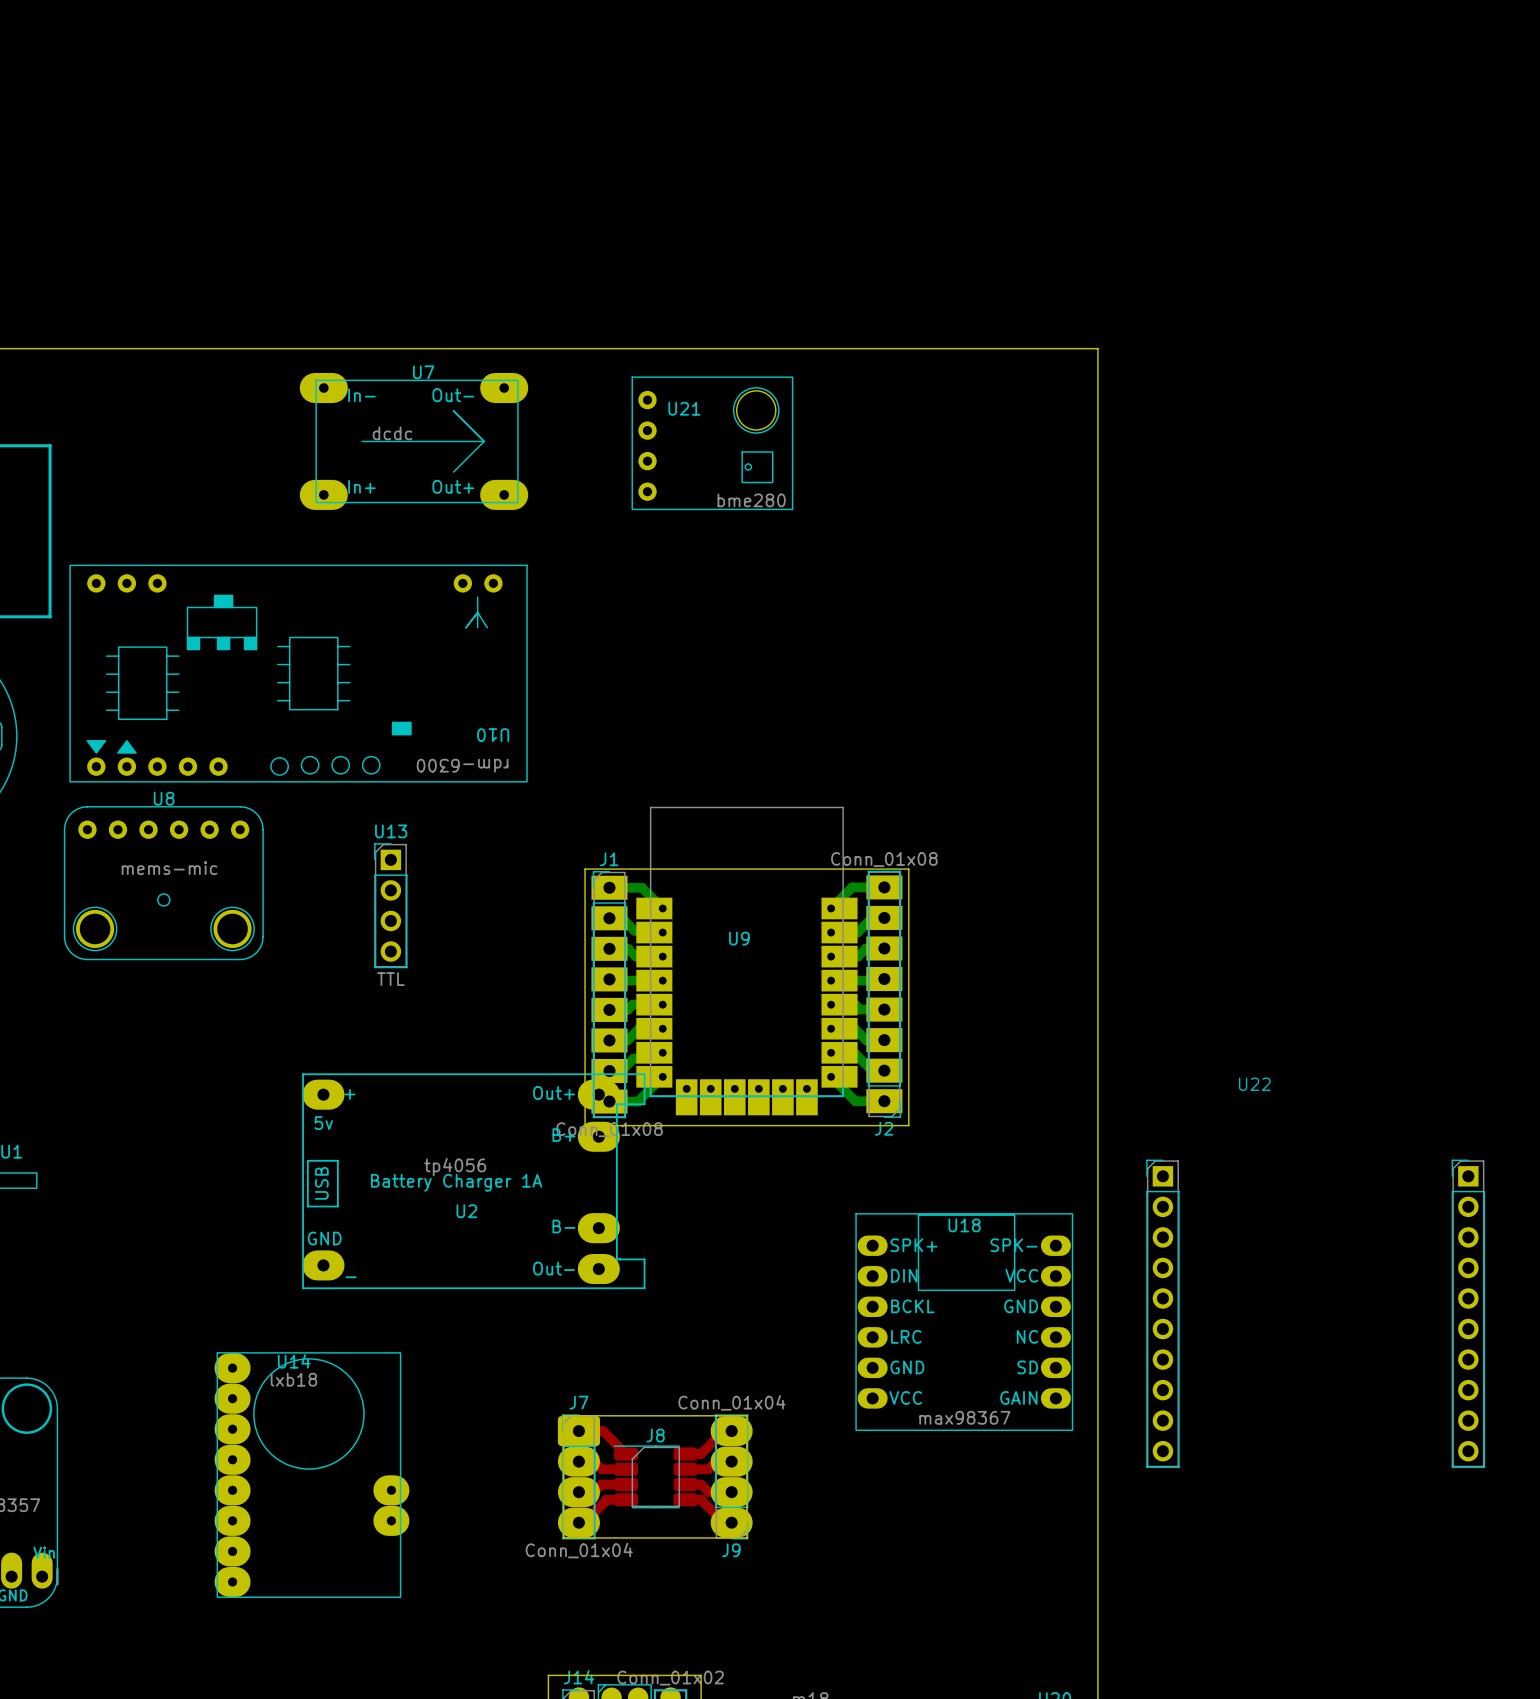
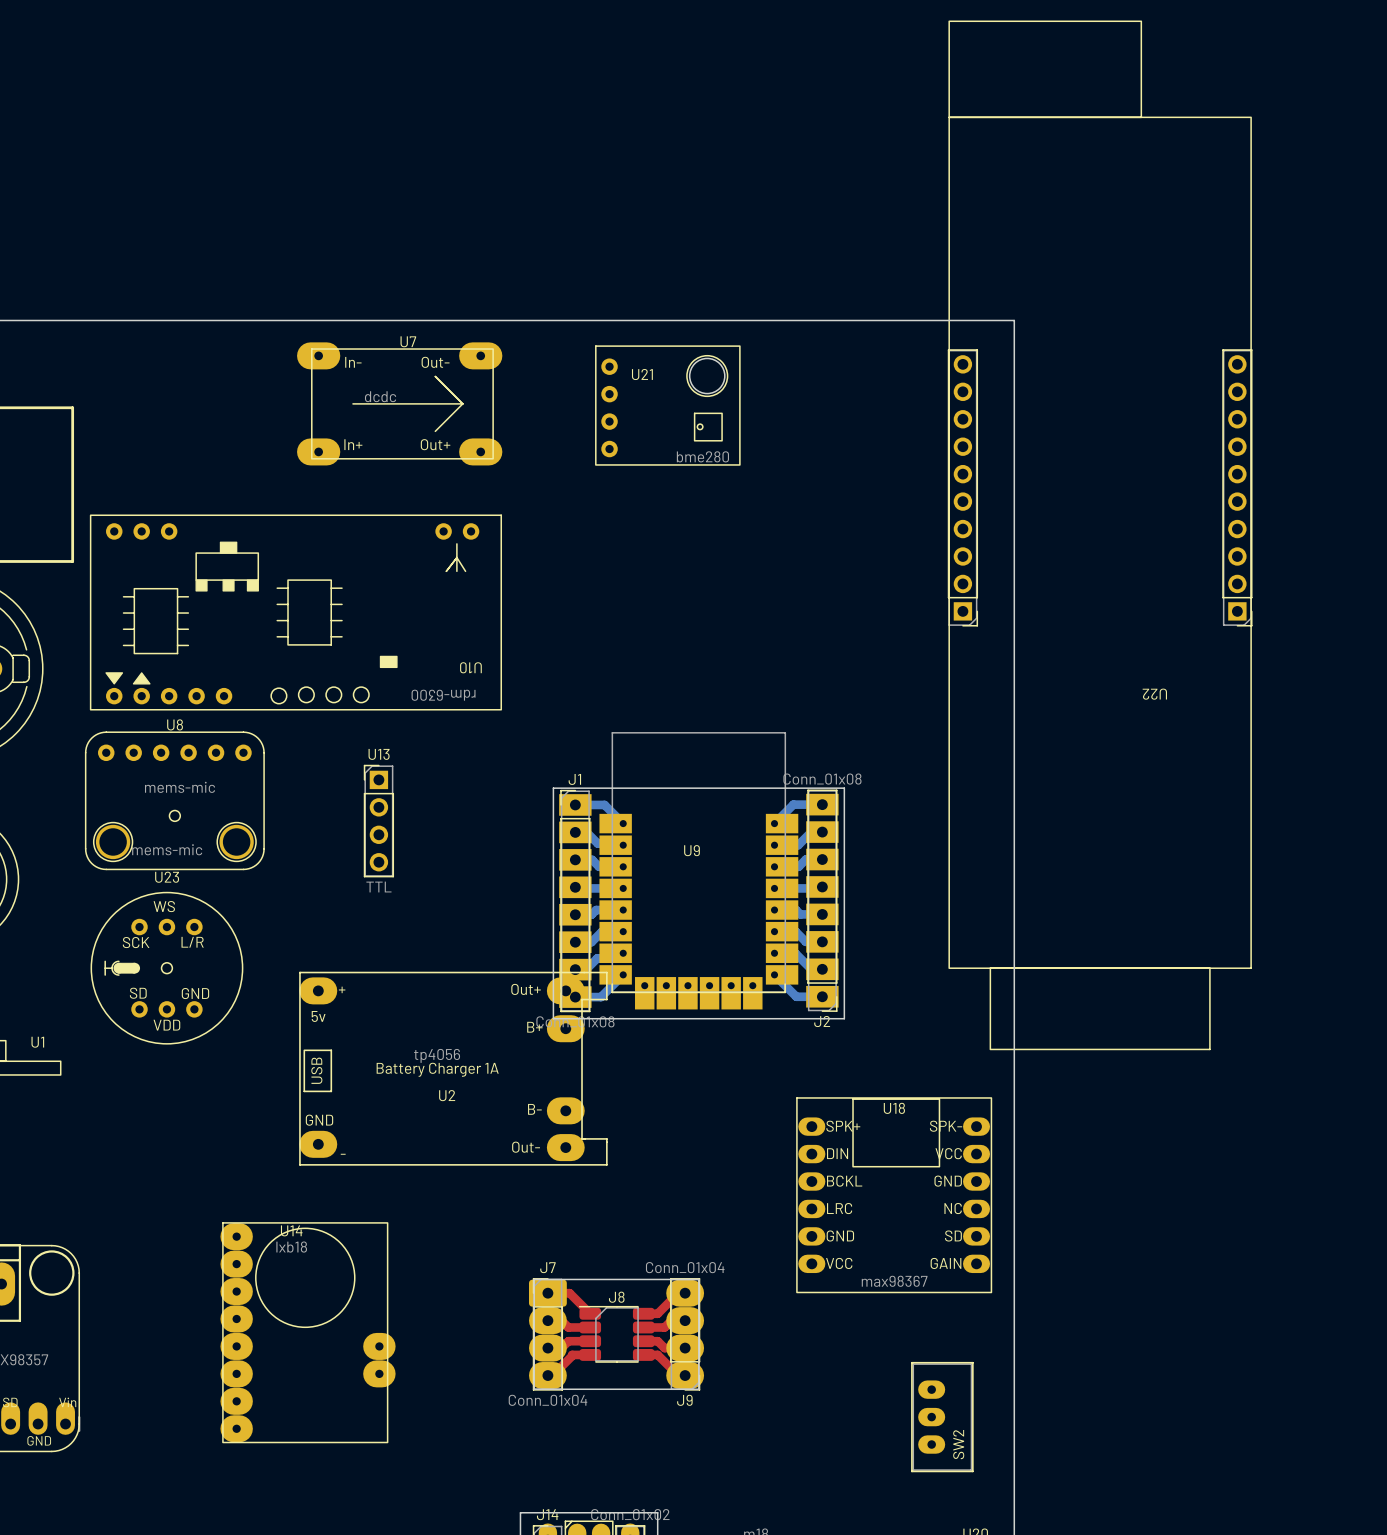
U23: none -> mems-mic (166, 968)
U22 name position: U22 (1254, 1084) -> U22 (1154, 694)
U22 footprint: [1146, 1159, 1486, 1468] -> [947, 20, 1253, 1050]
SW2: none -> (942, 1417)

